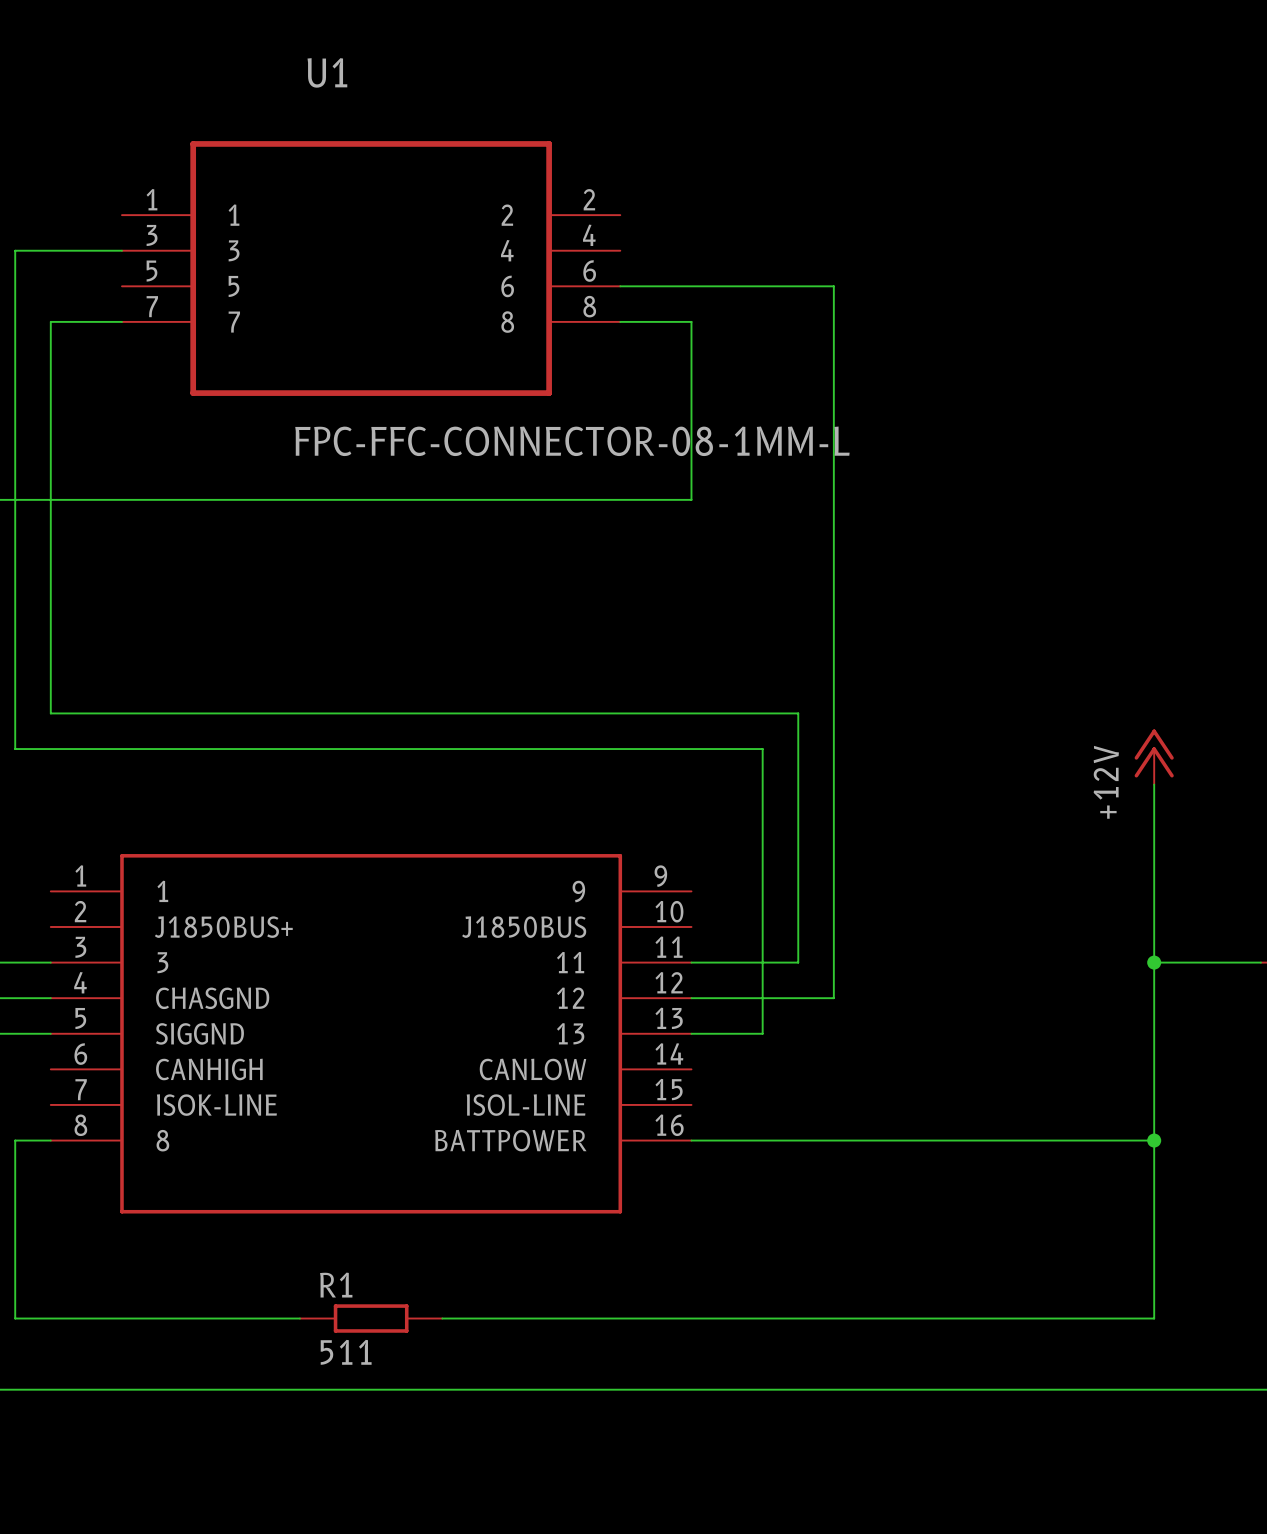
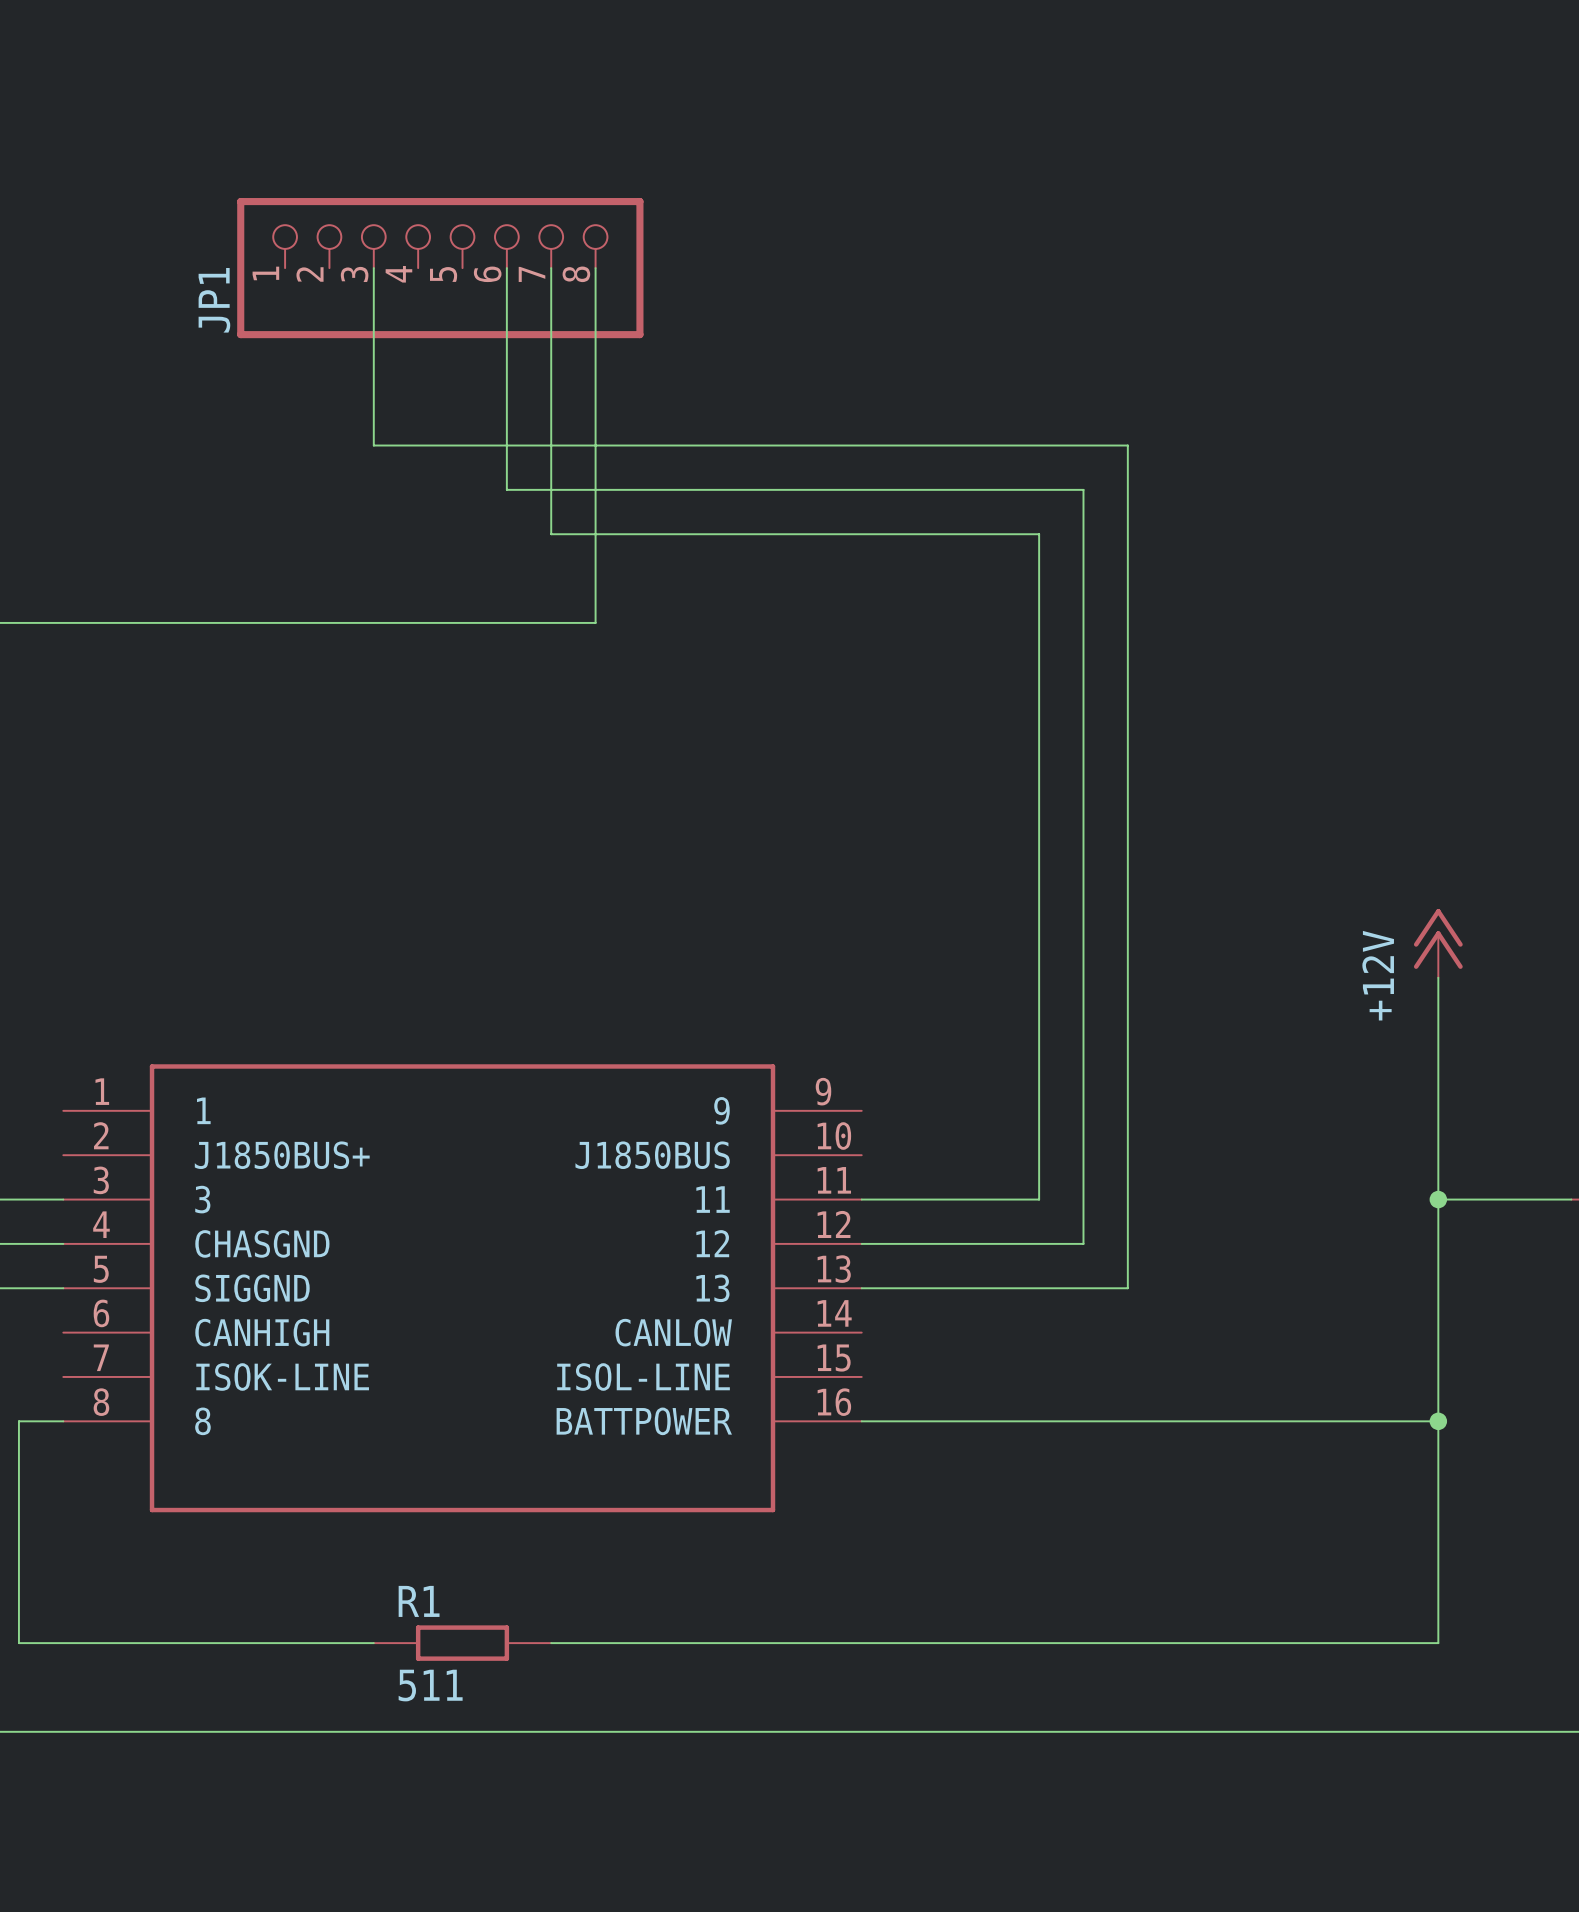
JP1: none -> (440, 268)
wire: none -> (506, 268) (506, 489) (1083, 489) (1083, 1243) (1039, 1243)
wire: (121, 250) (15, 250) (15, 749) (762, 749) (762, 1033) -> (373, 268) (373, 445) (1127, 445) (1127, 1288) (950, 1288)
U1: FPC-FFC-CONNECTOR-08-1MM-L (371, 268) -> none
wire: (620, 286) (833, 286) (833, 428) -> (551, 268) (551, 534) (1039, 534)
wire: (121, 321) (50, 321) (50, 713) (798, 713) (798, 962) -> none
wire: (620, 321) (691, 321) (691, 499) (477, 499) -> (595, 268) (595, 622)
wire: (833, 962) (833, 998) -> (1039, 1199) (994, 1199)

